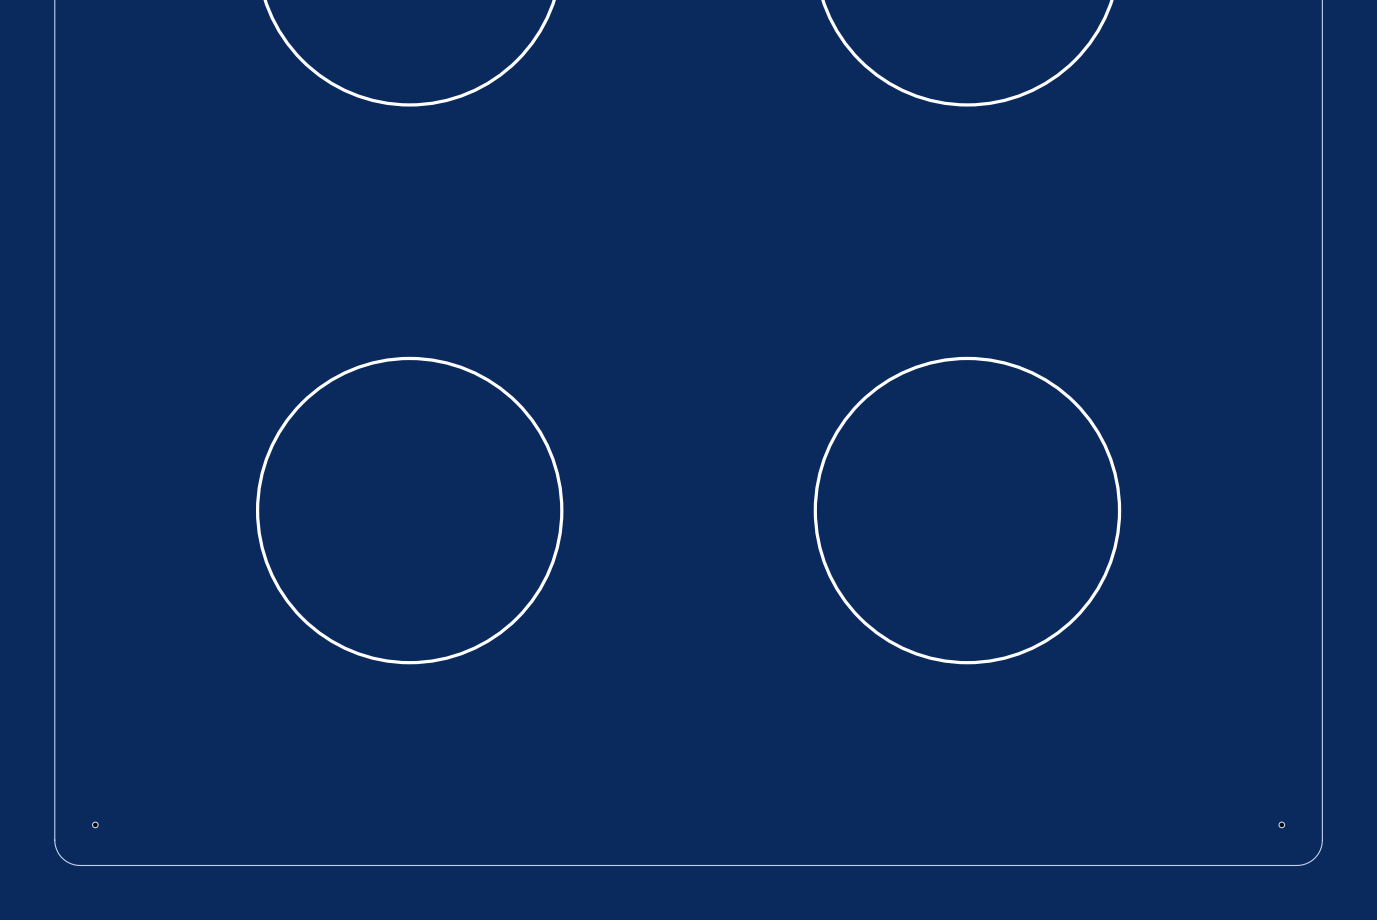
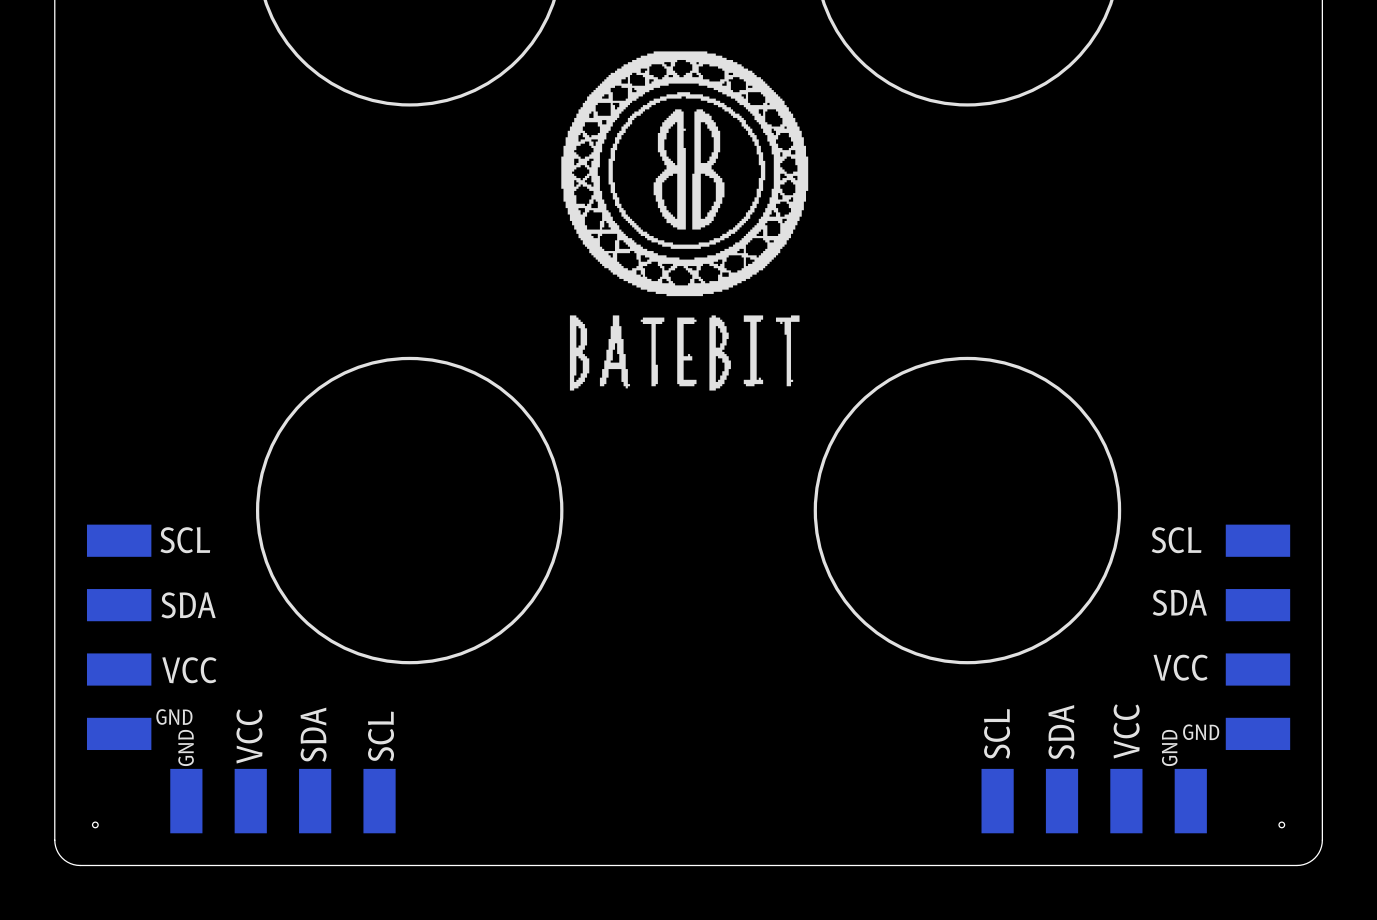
drawing: none -> [561, 51, 809, 391]
text: none -> SCL (185, 540)
text: none -> SCL (1176, 540)
text: none -> SDA (1179, 602)
text: none -> SDA (188, 605)
part: none -> (119, 637)
part: none -> (1257, 637)
text: none -> VCC (1180, 667)
text: none -> VCC (189, 670)
text: none -> GND (174, 717)
text: none -> SCL (997, 733)
text: none -> SDA (1061, 732)
text: none -> VCC (1126, 731)
text: none -> SDA (313, 734)
text: none -> SCL (380, 736)
text: none -> VCC (249, 736)
text: none -> GND (1201, 732)
text: none -> GND (186, 747)
text: none -> GND (1169, 747)
part: none -> (282, 801)
part: none -> (1094, 801)

